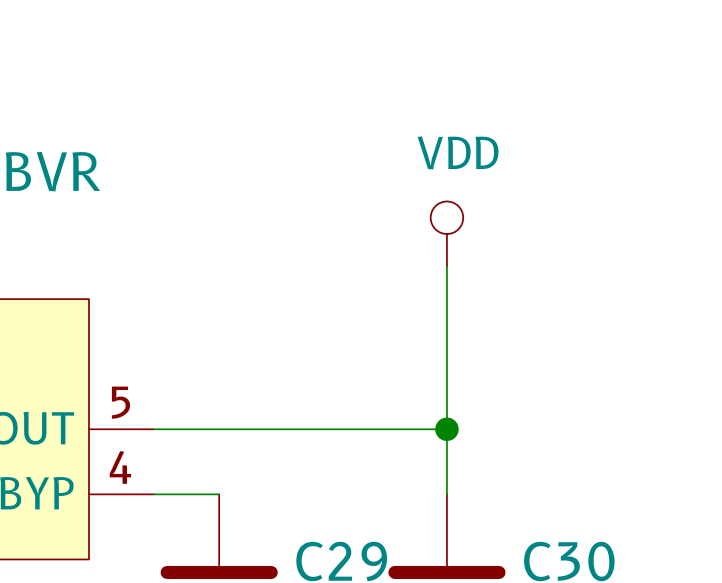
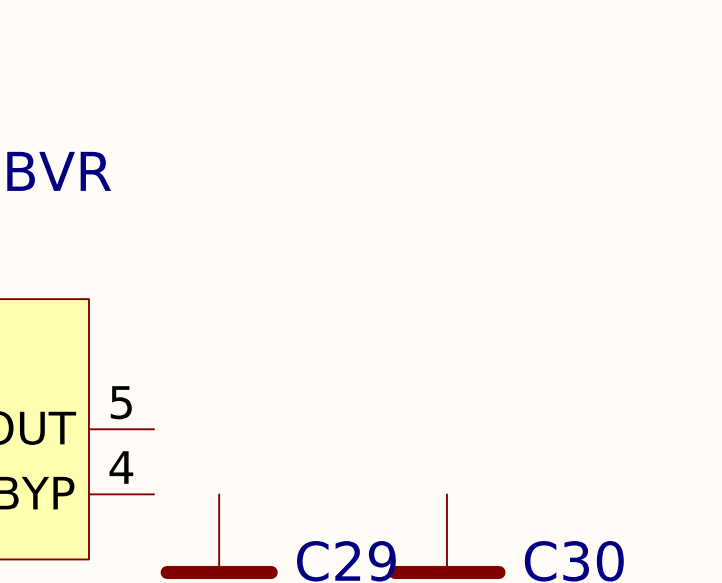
power symbol: VDD (446, 234) -> none
wire: (446, 266) (446, 494) -> none
wire: (154, 429) (446, 429) -> none
junction: (446, 429) -> none
wire: (154, 494) (219, 494) -> none

